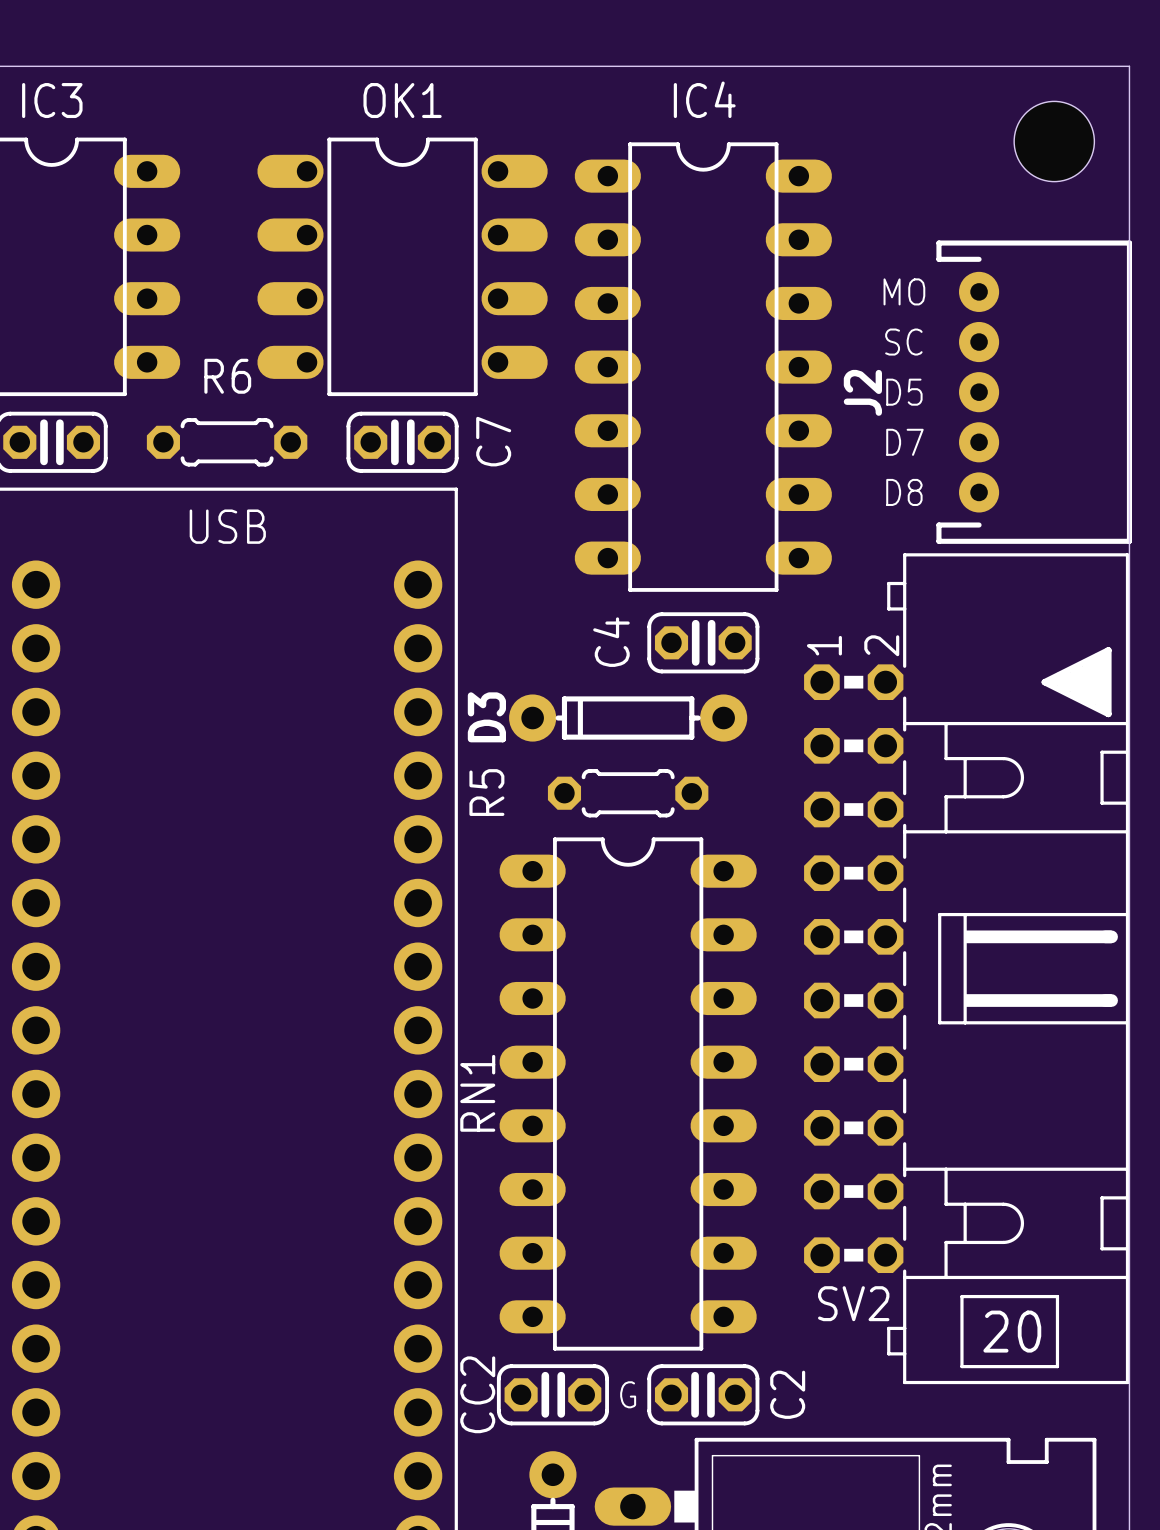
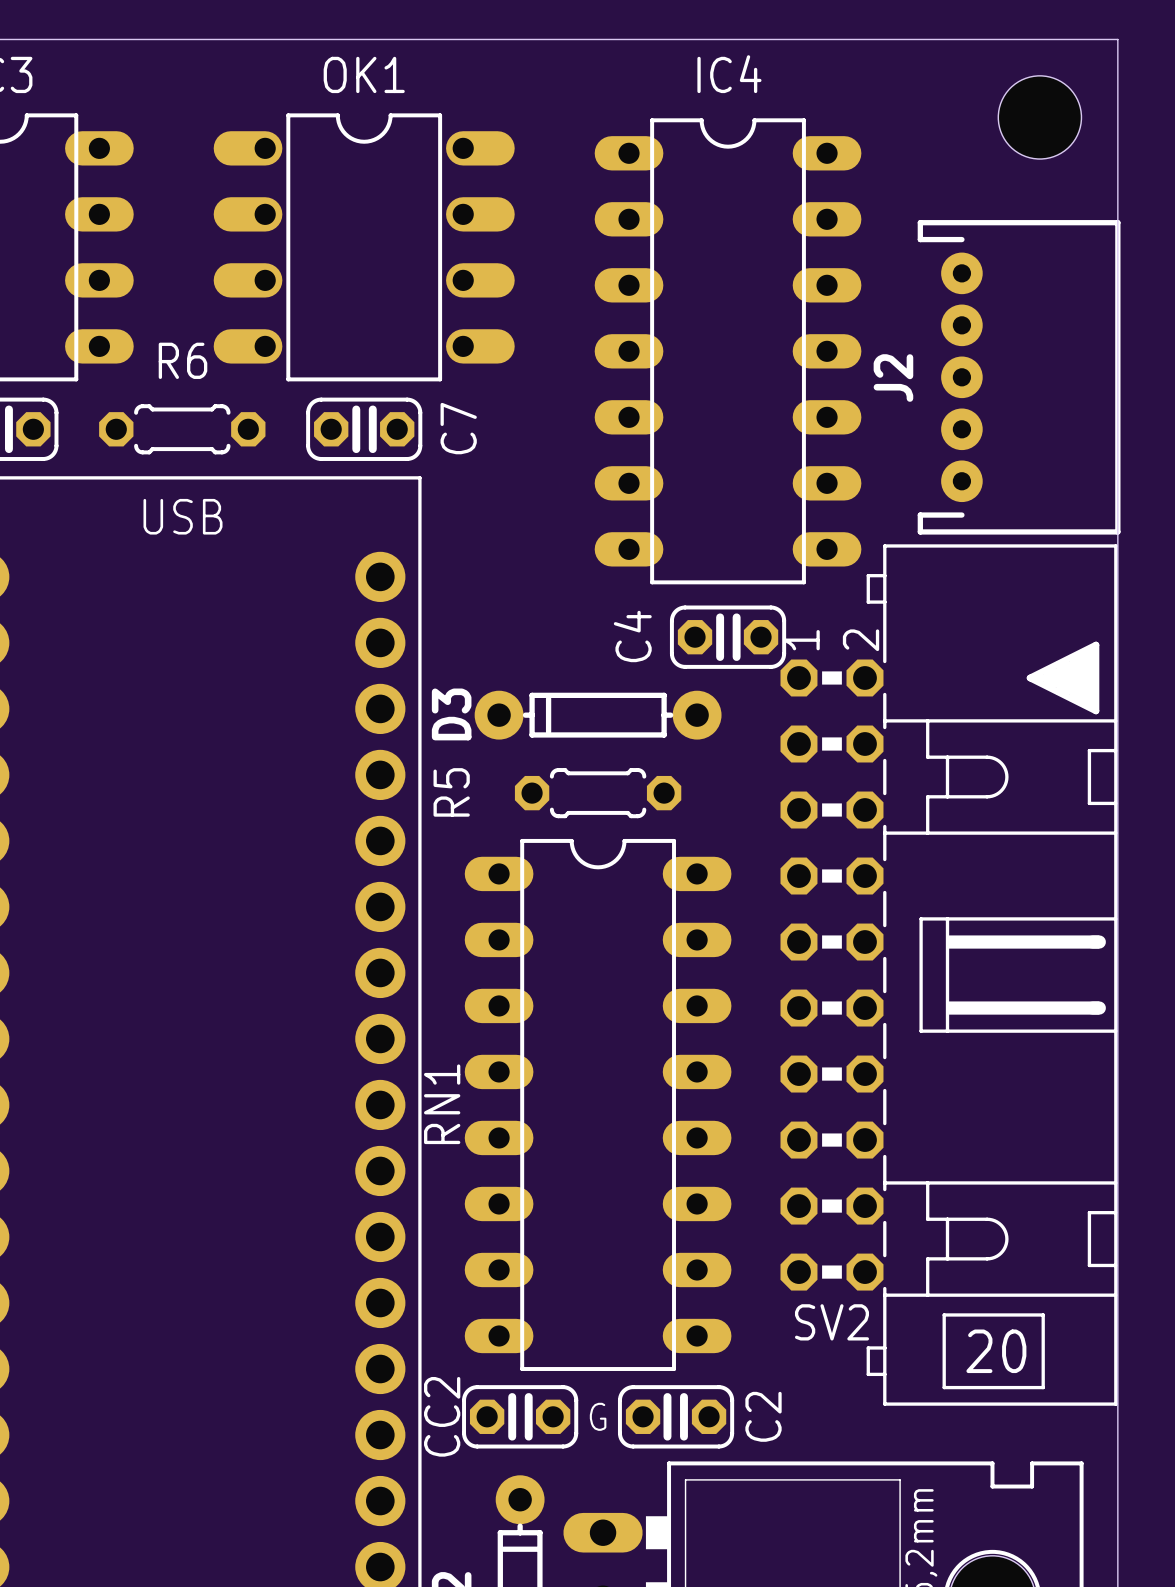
text: MO (904, 291) -> none
text: SC (903, 342) -> none
IC4 position: (703, 367) -> (728, 351)
J2 name position: J2 (862, 392) -> J2 (893, 378)
text: D5 (904, 392) -> none
text: D7 (904, 442) -> none
text: D8 (904, 492) -> none
C4 position: (703, 642) -> (728, 637)

